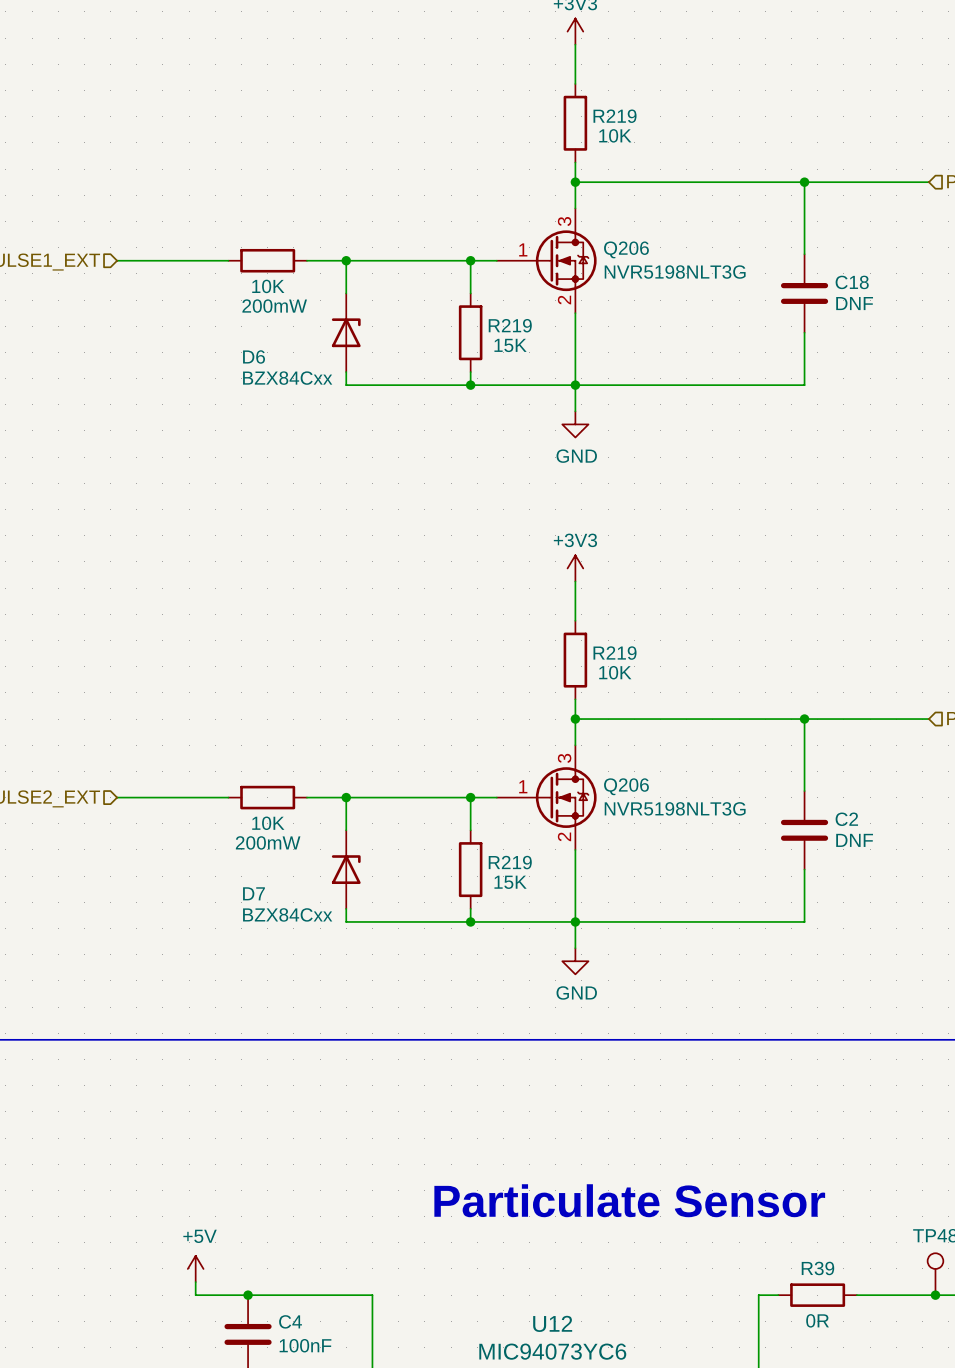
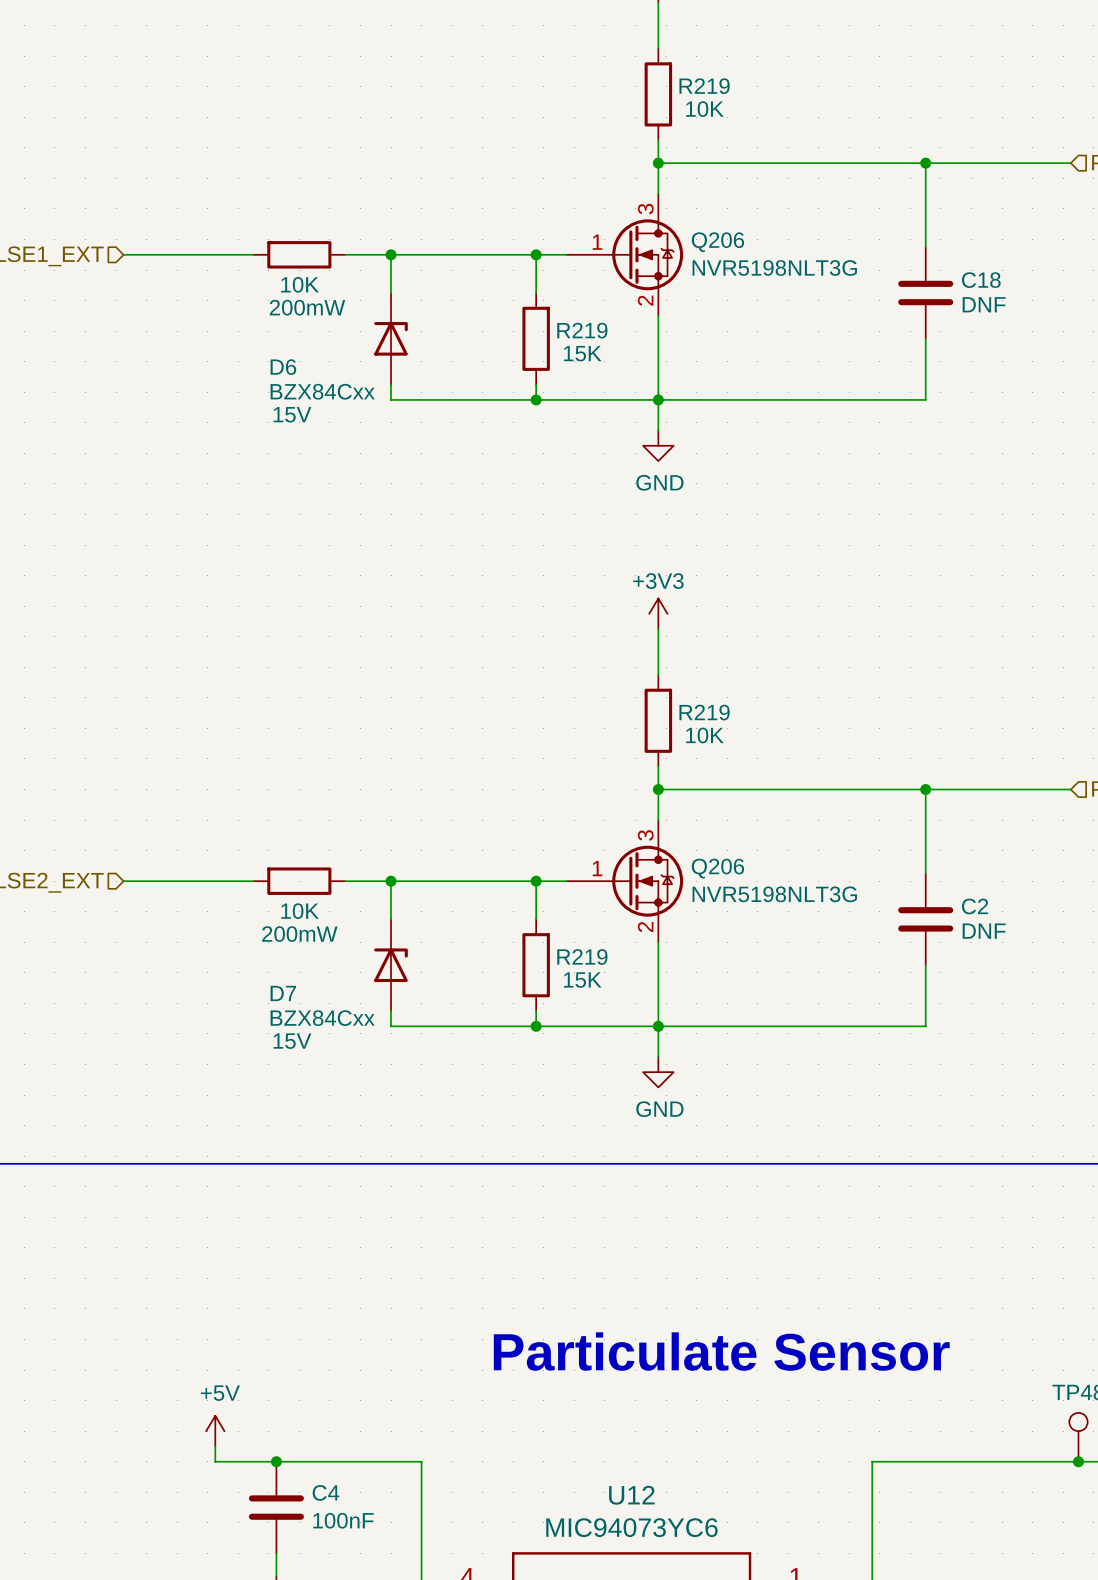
D6 text: none -> 15V (292, 414)
D7 text: none -> 15V (292, 1041)
wire: none -> (895, 1461) (986, 1461)
R39: 0R (817, 1295) -> none

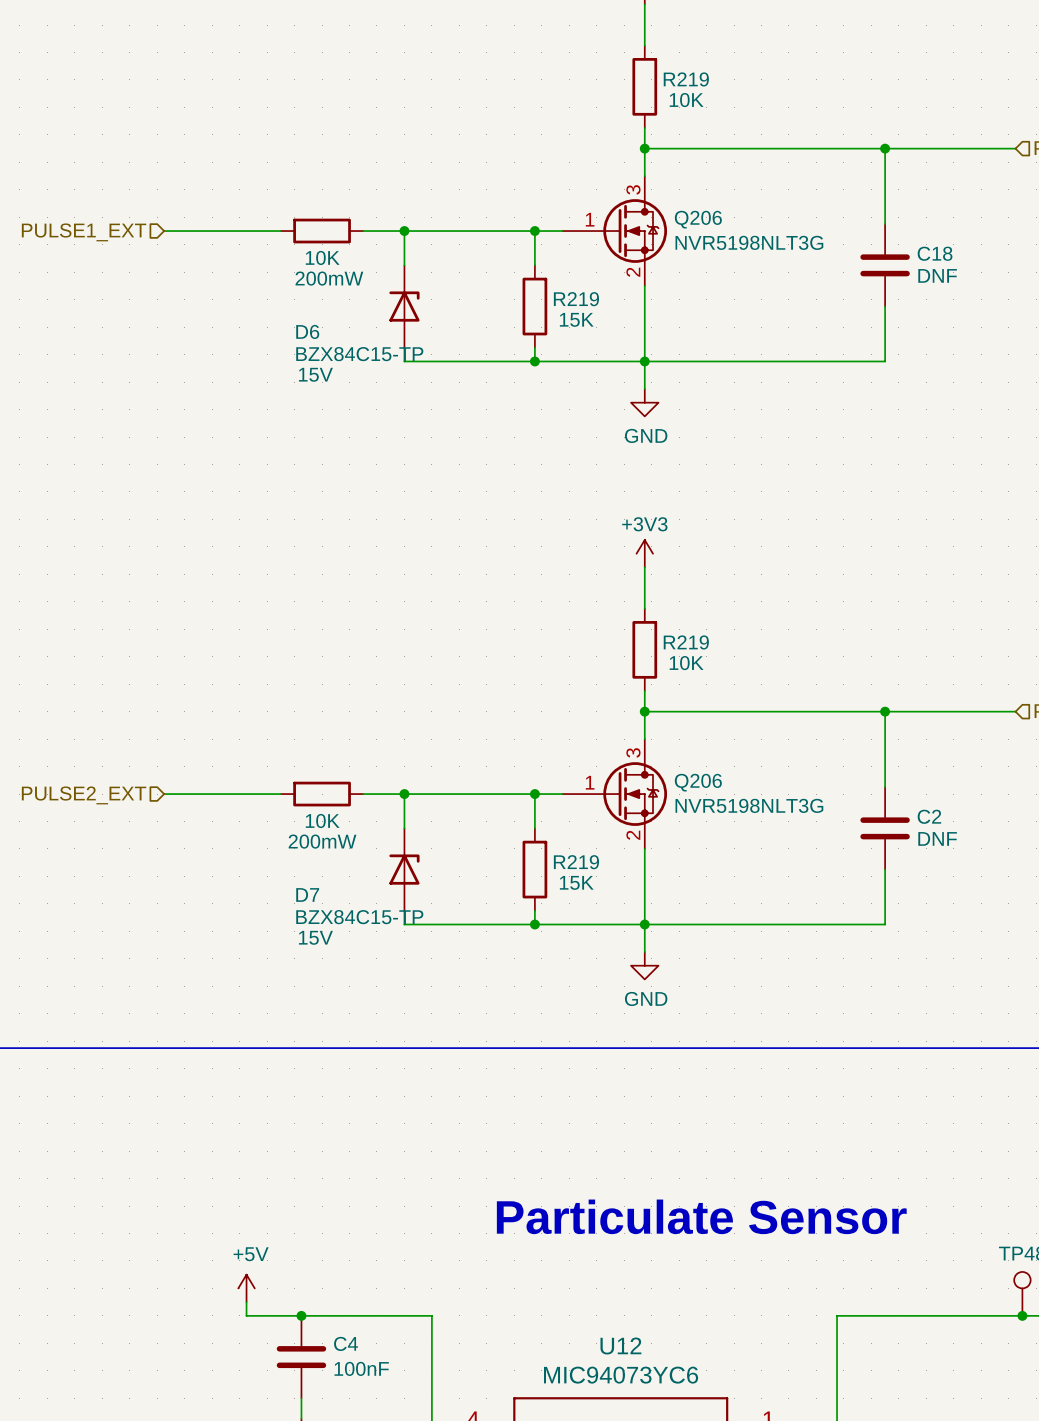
D6 value: BZX84Cxx (322, 391) -> BZX84C15-TP (359, 354)
D7 value: BZX84Cxx (322, 1018) -> BZX84C15-TP (359, 917)

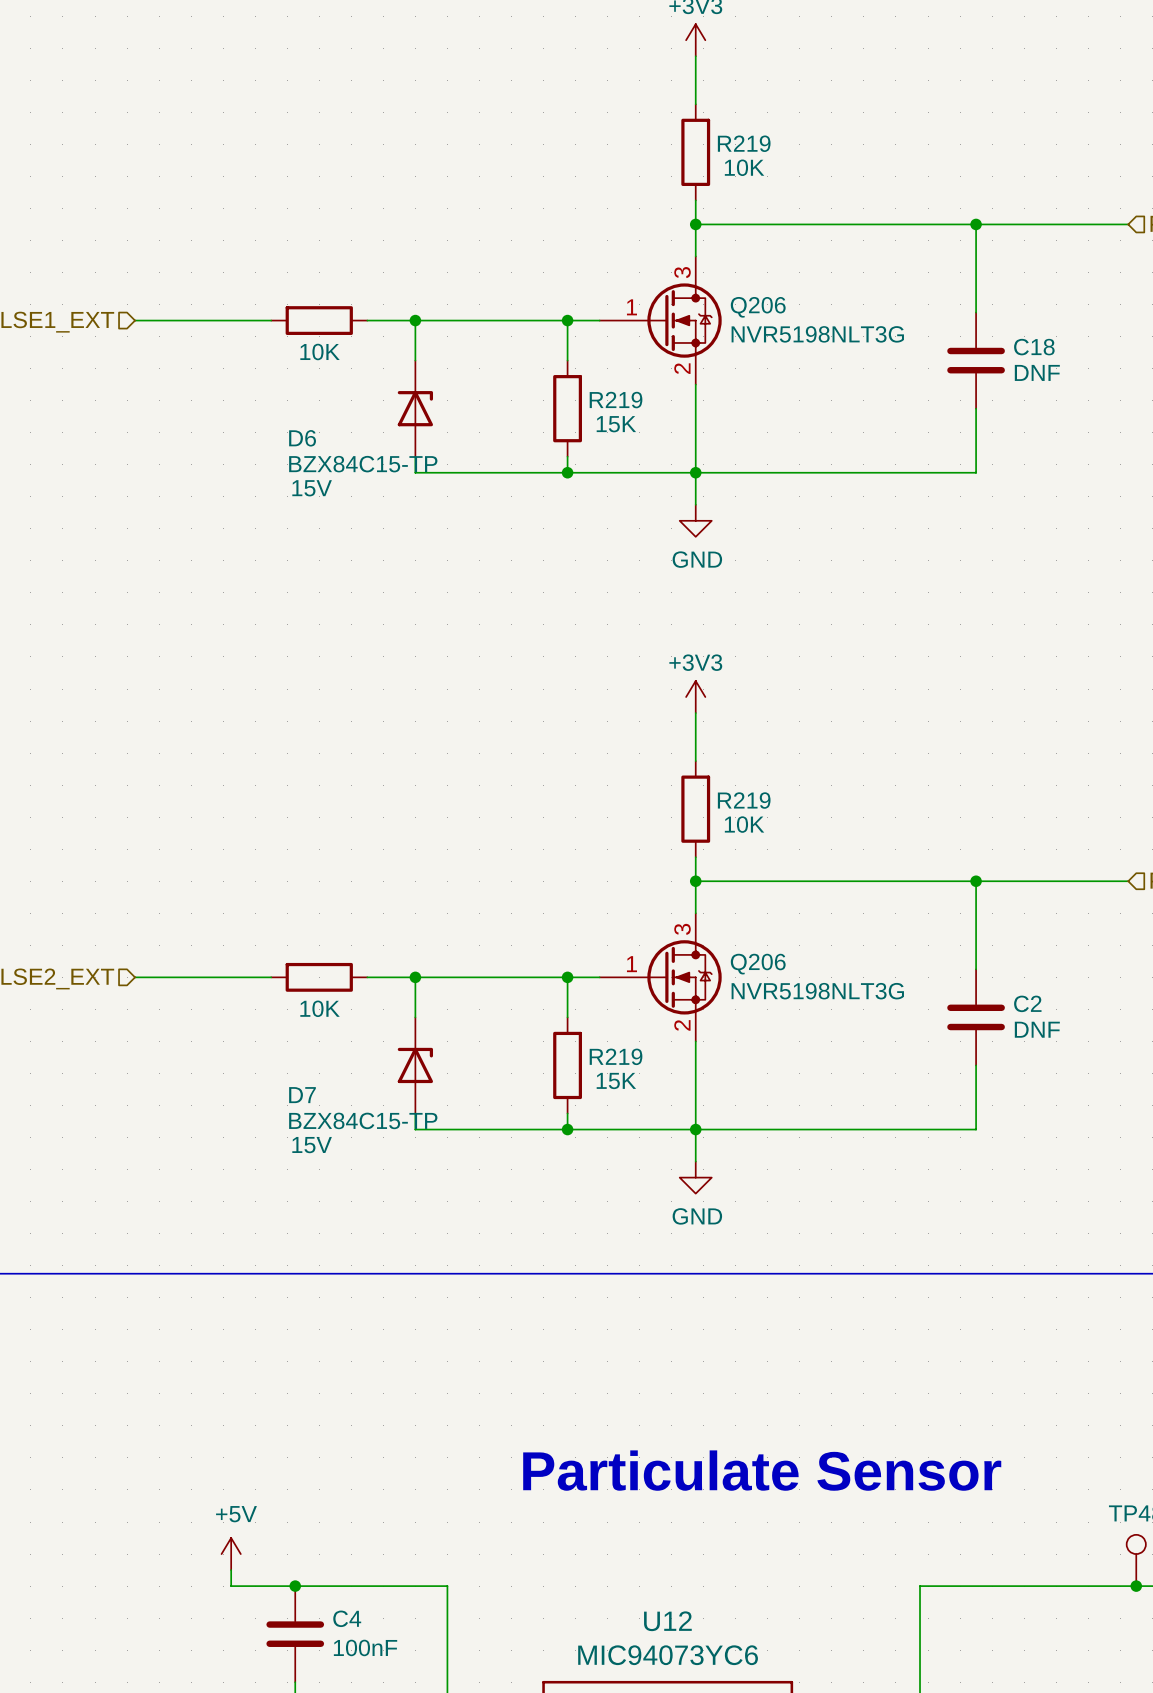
part text: 200mW (329, 278) -> none
part text: 200mW (322, 841) -> none

